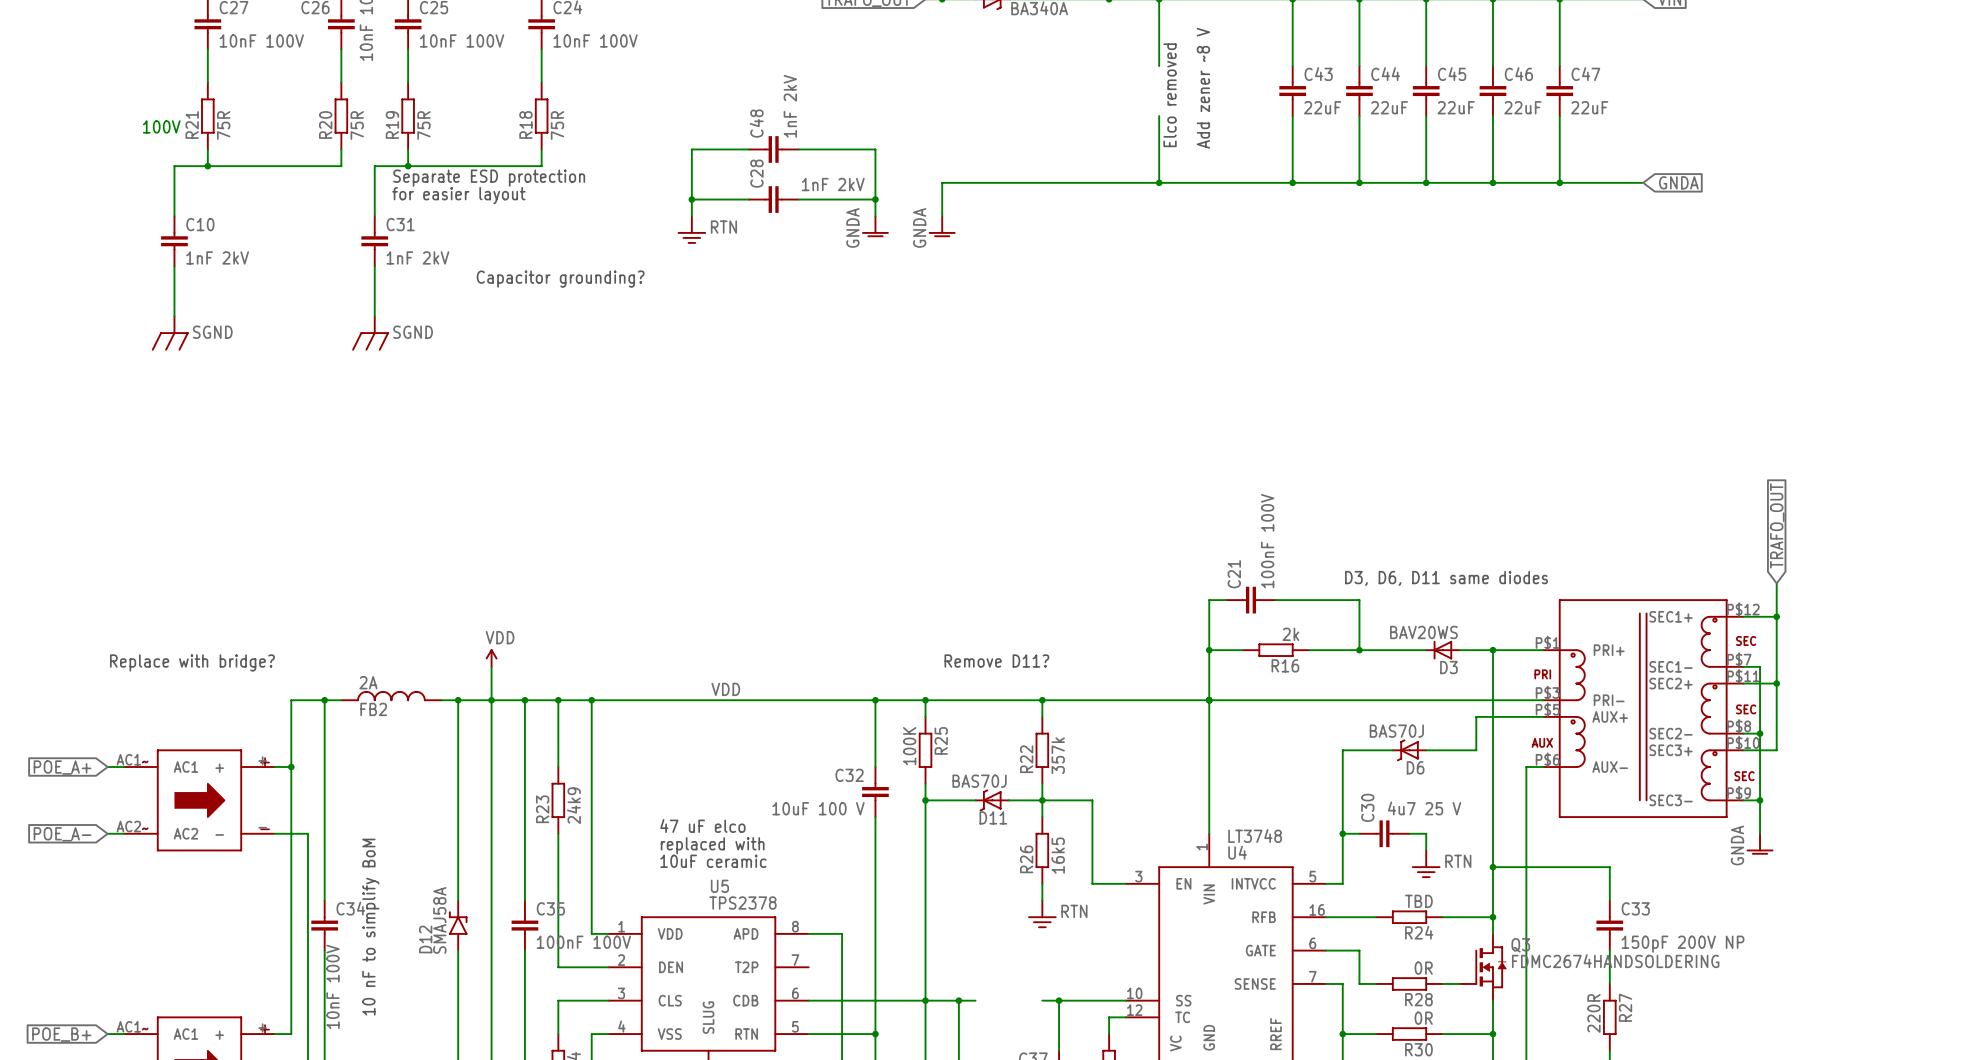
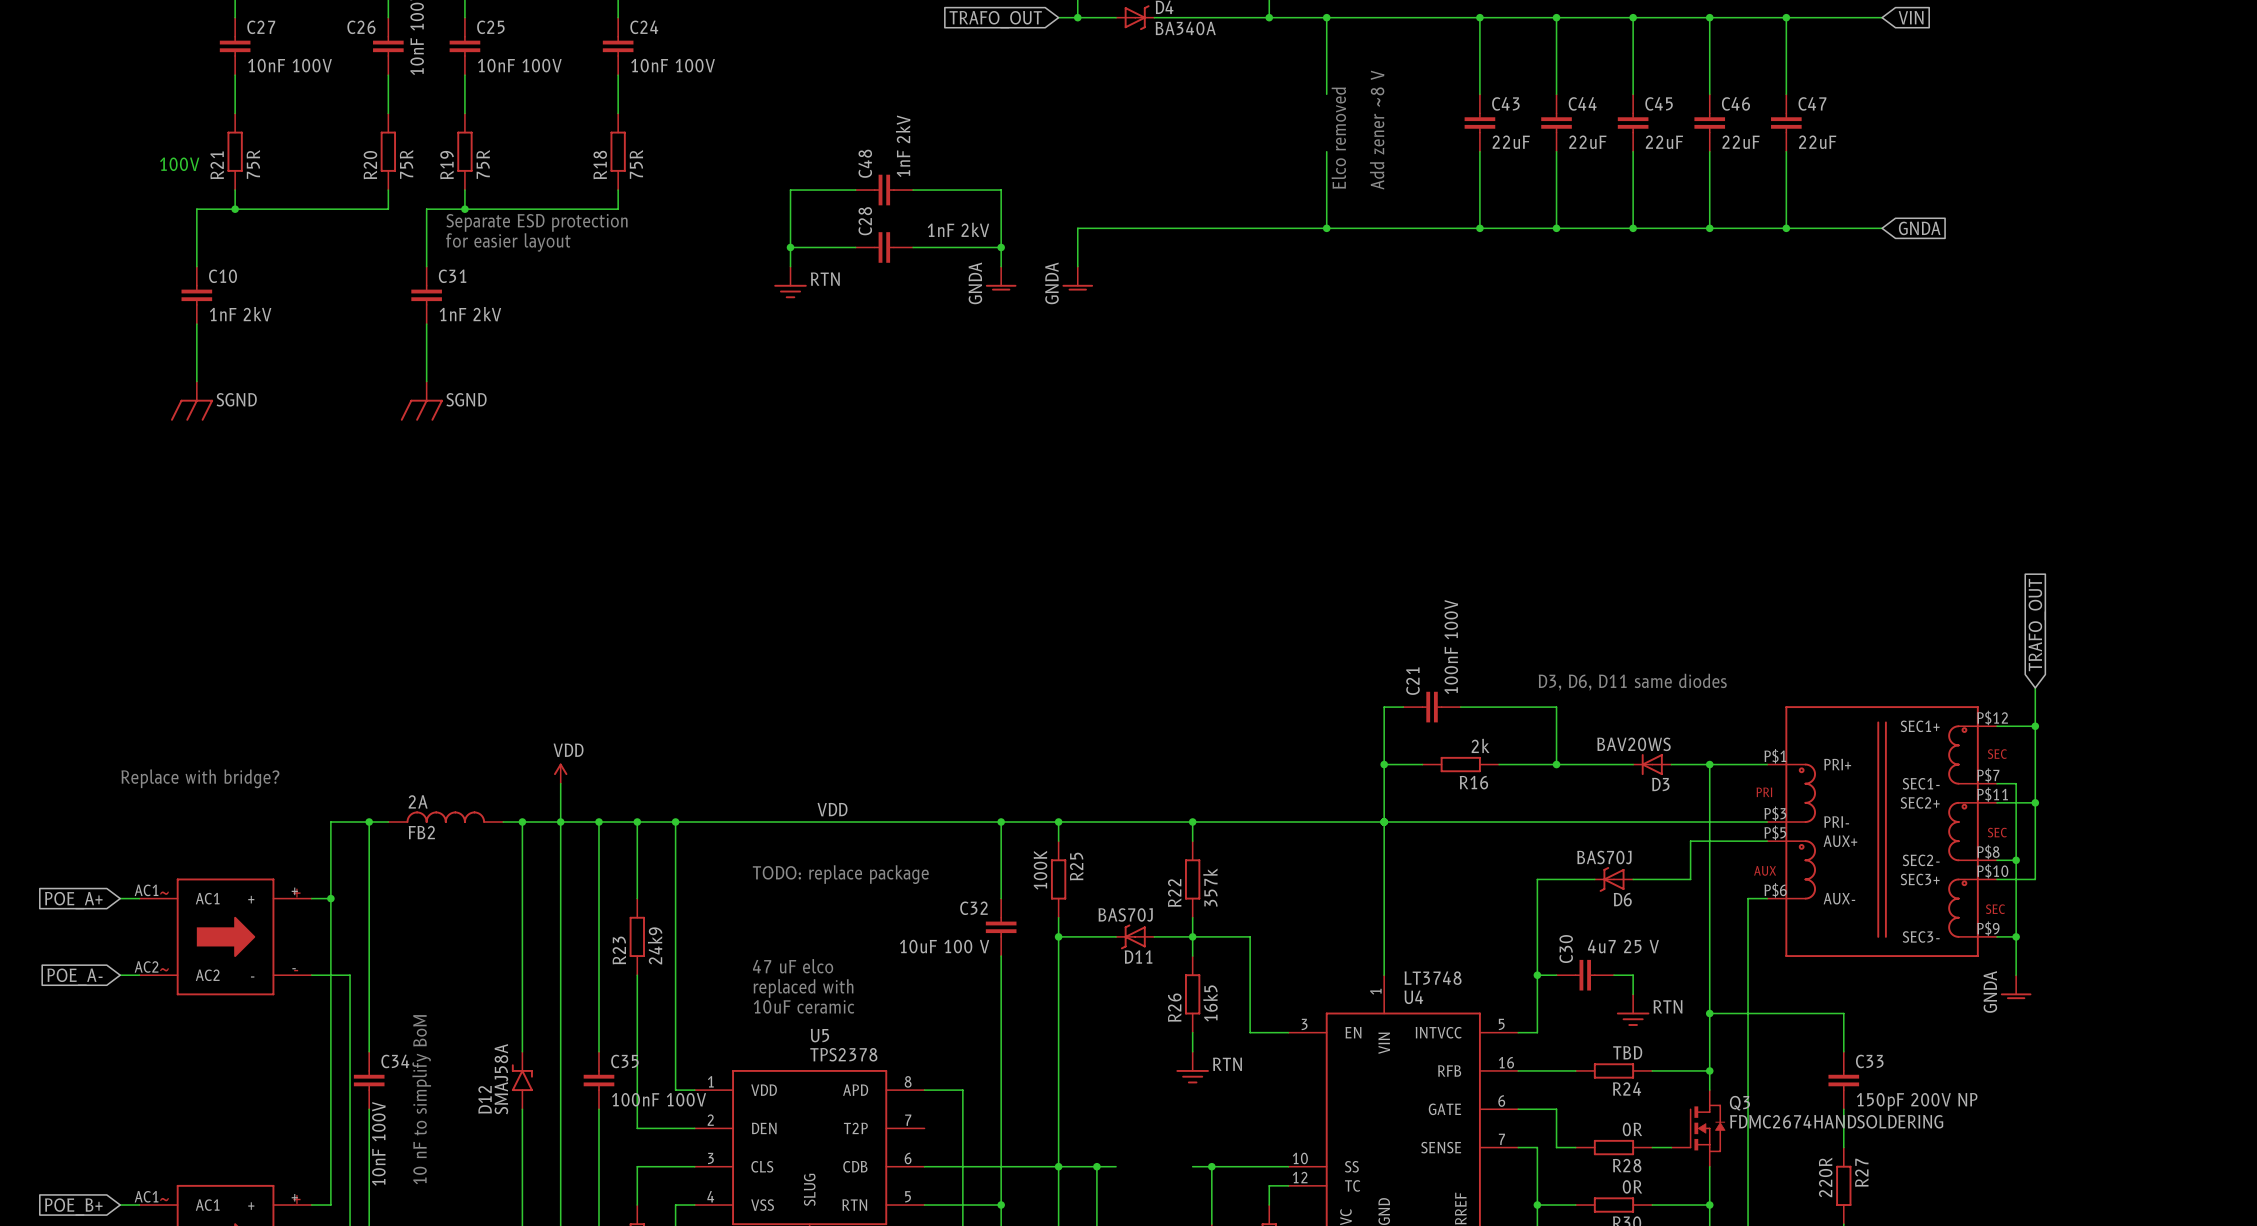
text: Capacitor grounding? (560, 279) -> none
text: Remove D11? (996, 661) -> none
text: none -> TODO: replace package (840, 874)

